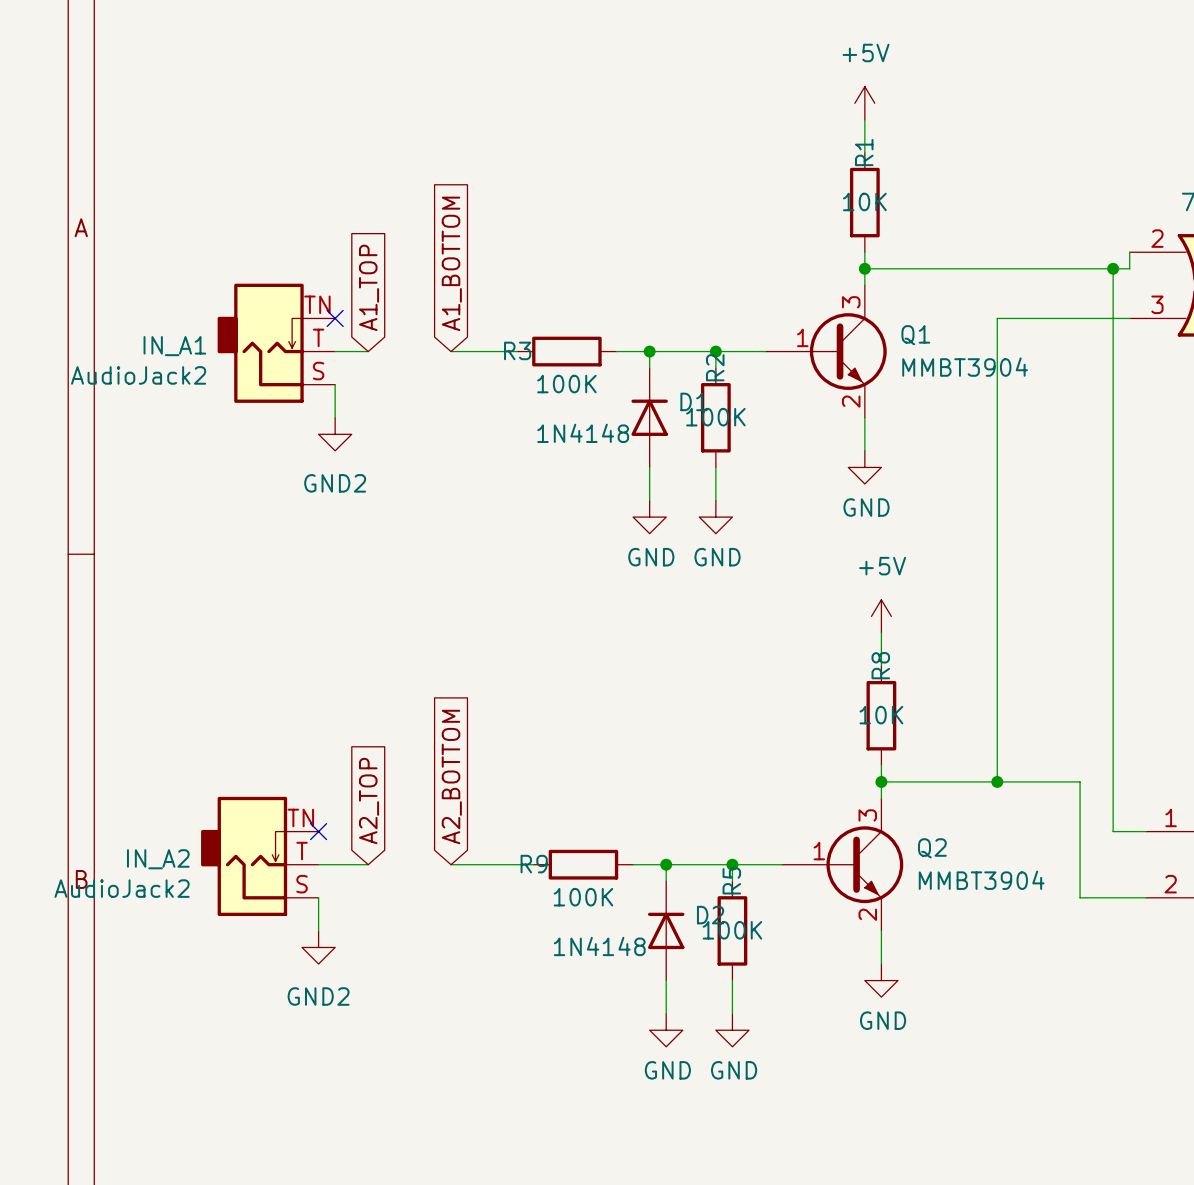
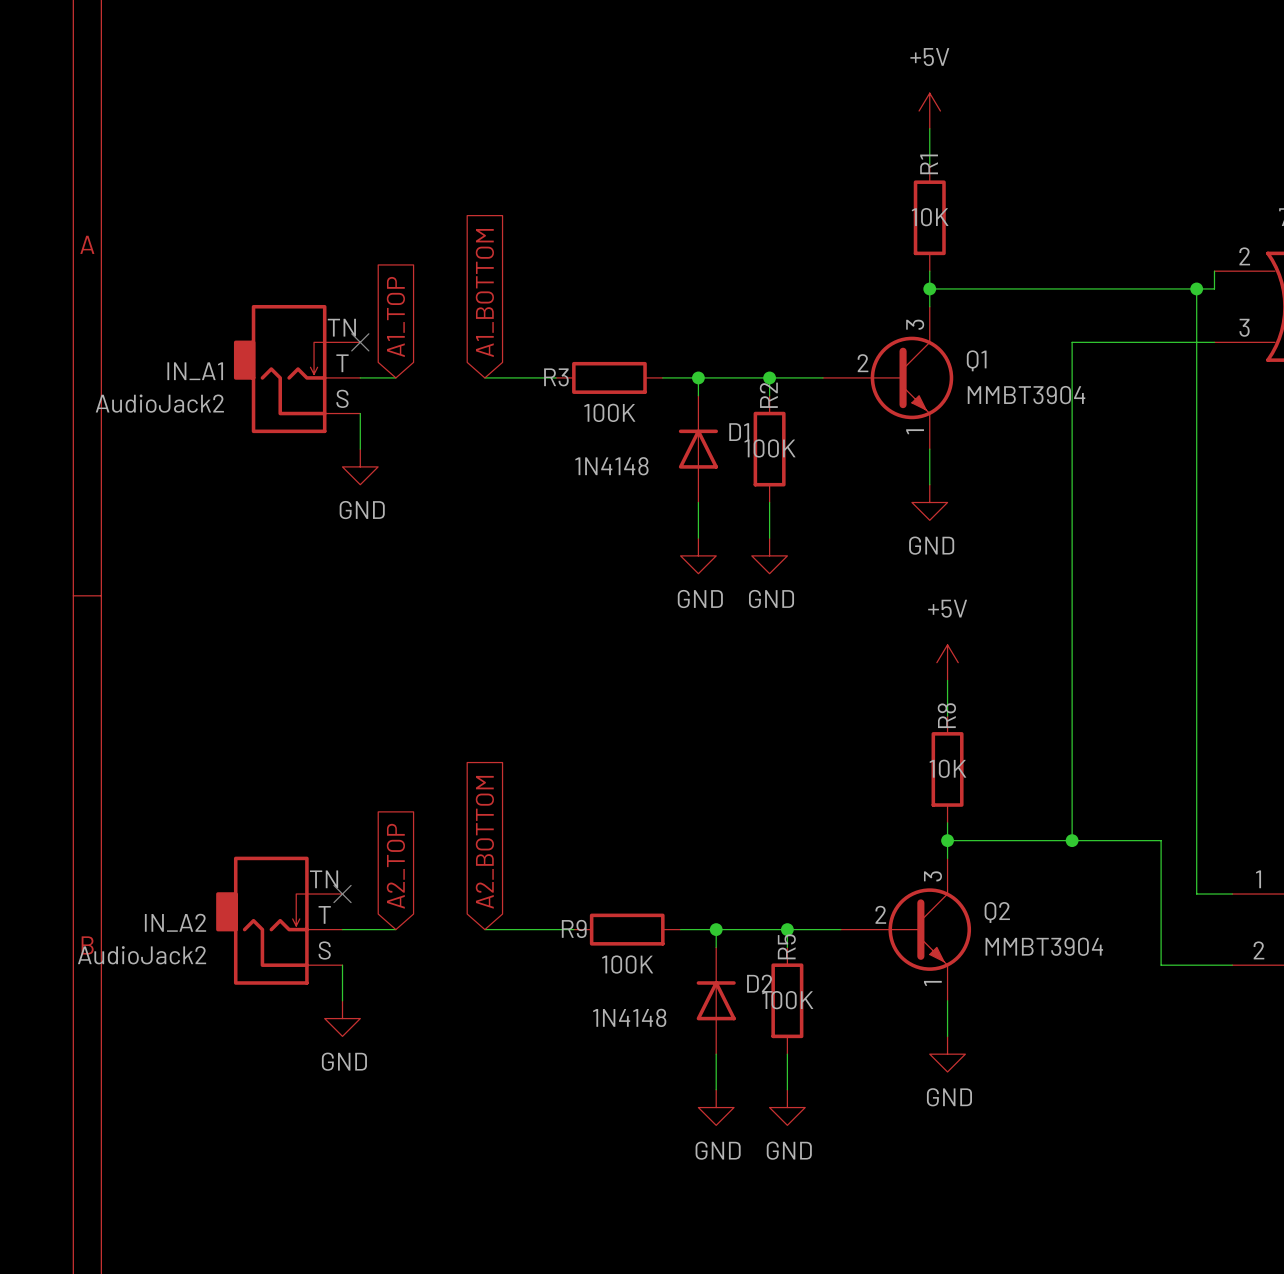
Q1 pin number: 1 (802, 337) -> 2 (863, 363)
Q1 pin number: 2 (851, 401) -> 1 (915, 431)
power symbol: GND2 (335, 434) -> GND (360, 466)
Q2 pin number: 1 (819, 851) -> 2 (880, 914)
Q2 pin number: 2 (867, 914) -> 1 (932, 983)
power symbol: GND2 (318, 947) -> GND (342, 1018)

